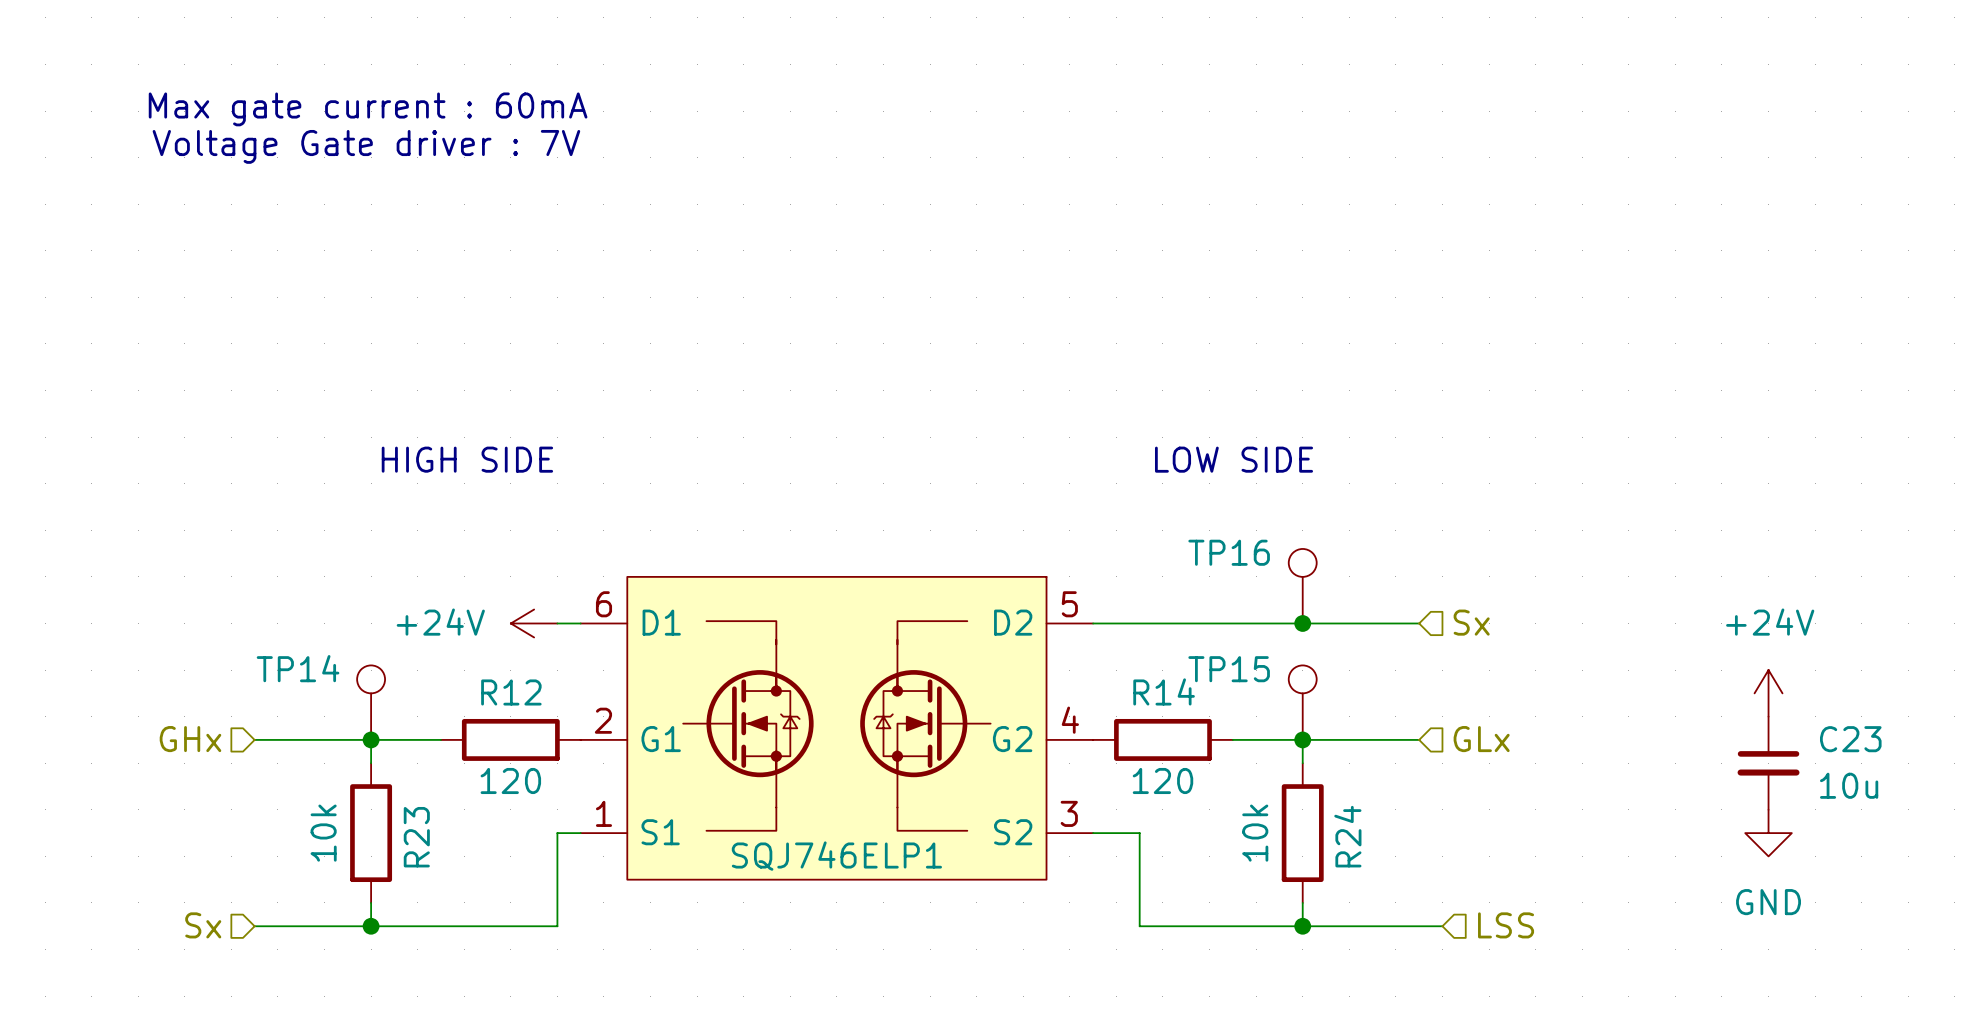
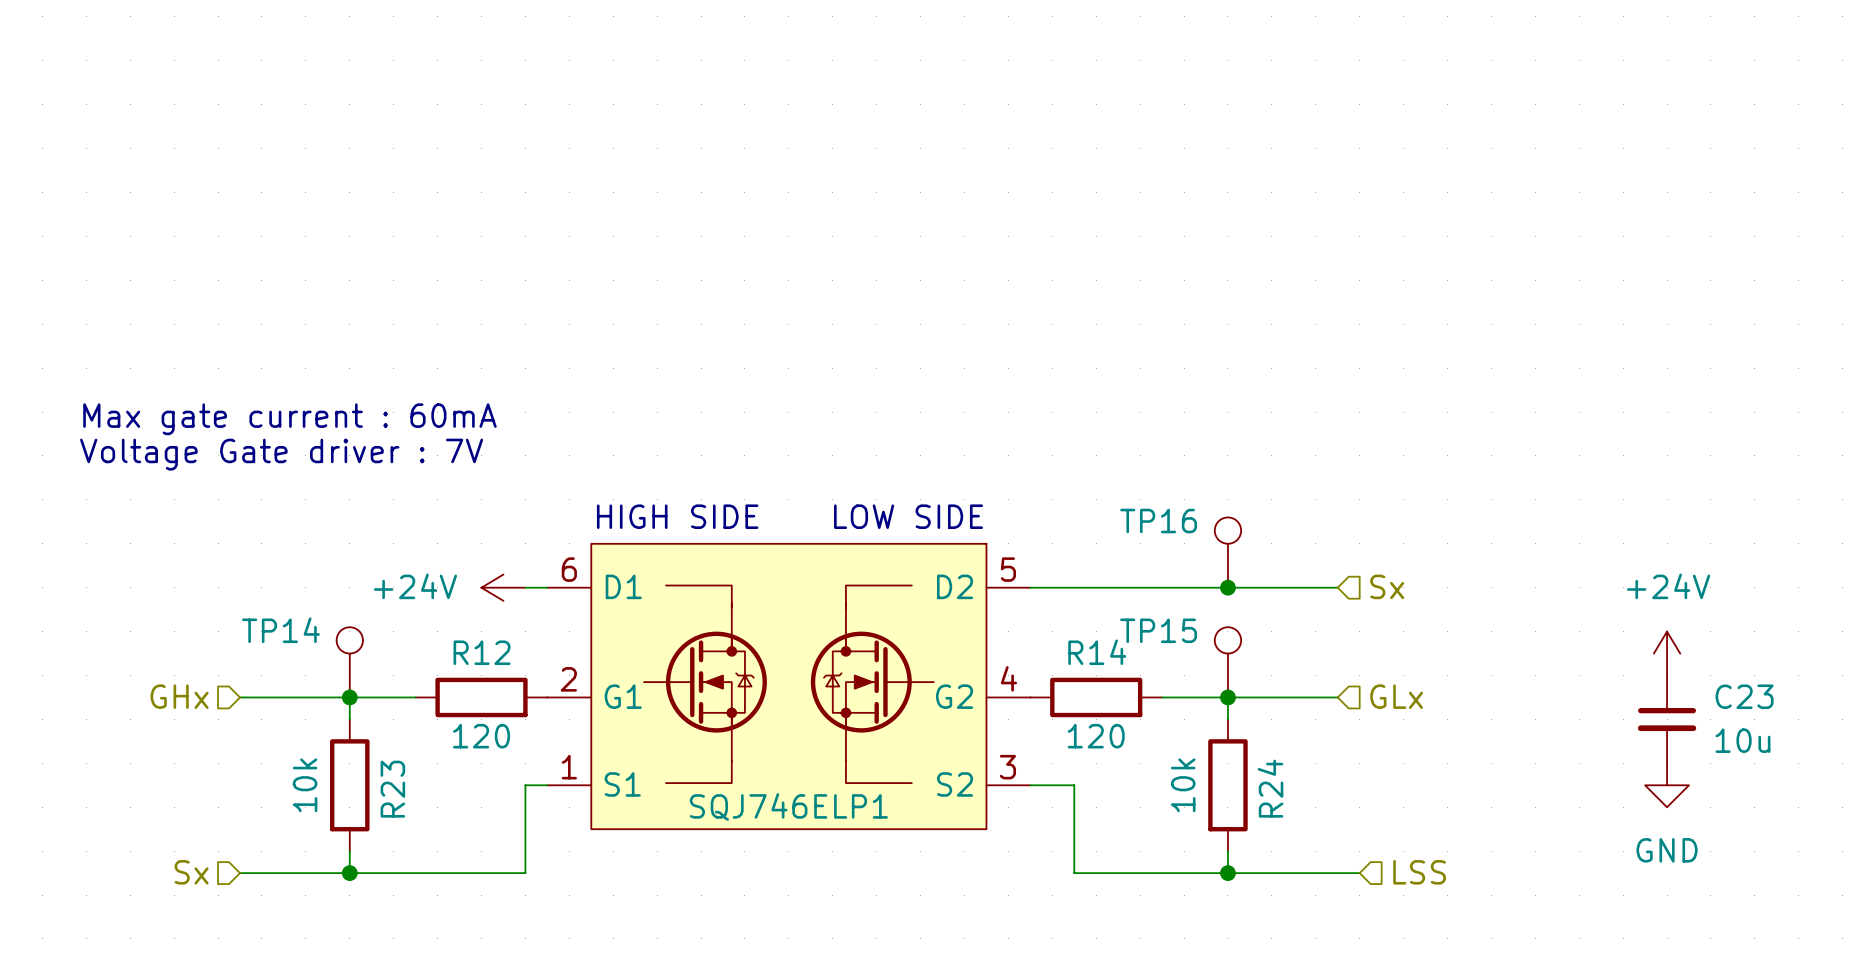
text position: Max gate current : 60mA (368, 109) -> Max gate current : 60mA (289, 419)
text position: Voltage Gate driver : 7V (366, 146) -> Voltage Gate driver : 7V (281, 454)
text position: HIGH SIDE (467, 459) -> HIGH SIDE (677, 516)
text position: LOW SIDE (1234, 459) -> LOW SIDE (908, 516)

